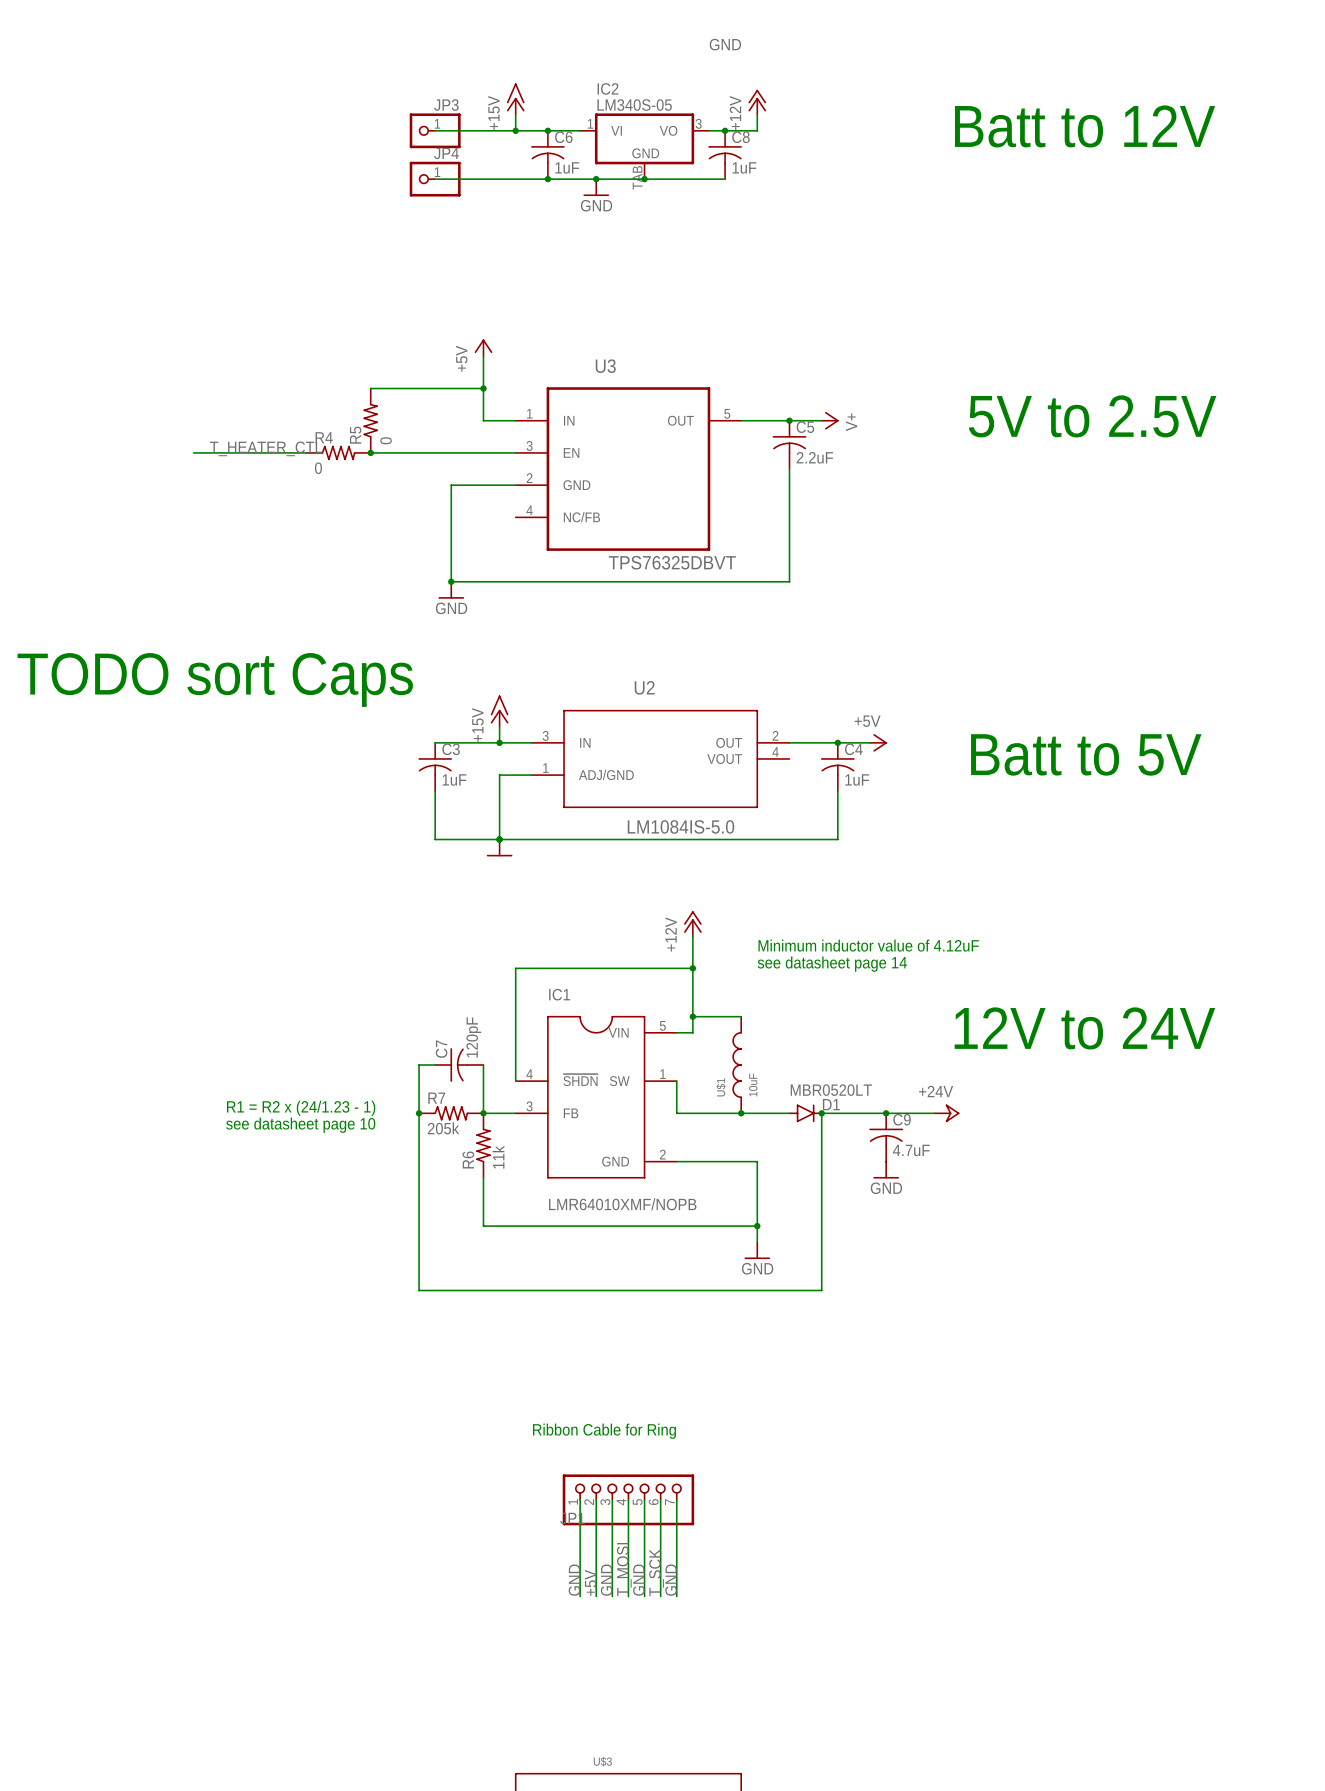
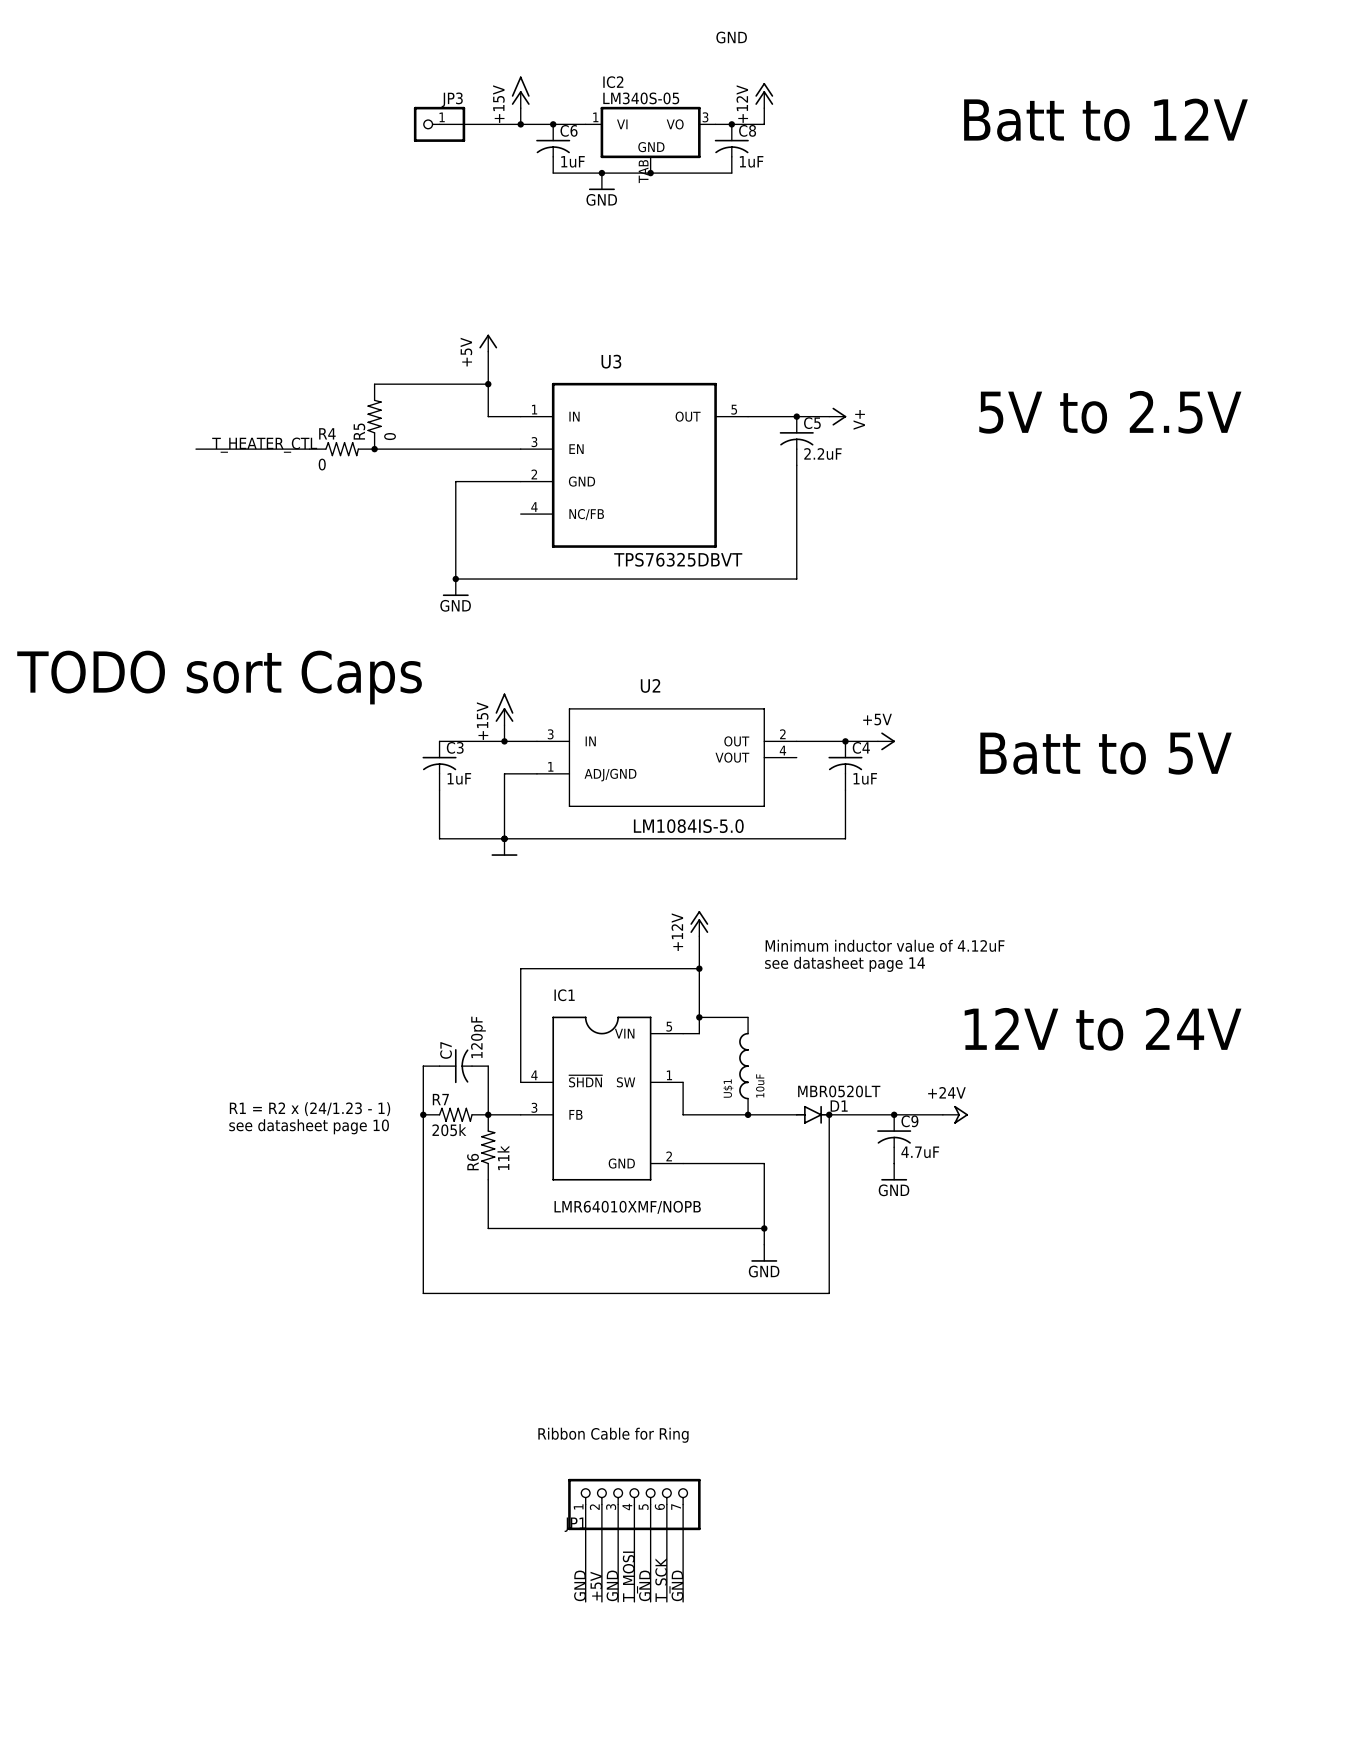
wire: (435, 179) (547, 179) -> none
JP4: (435, 179) -> none
junction: (547, 179) -> none

